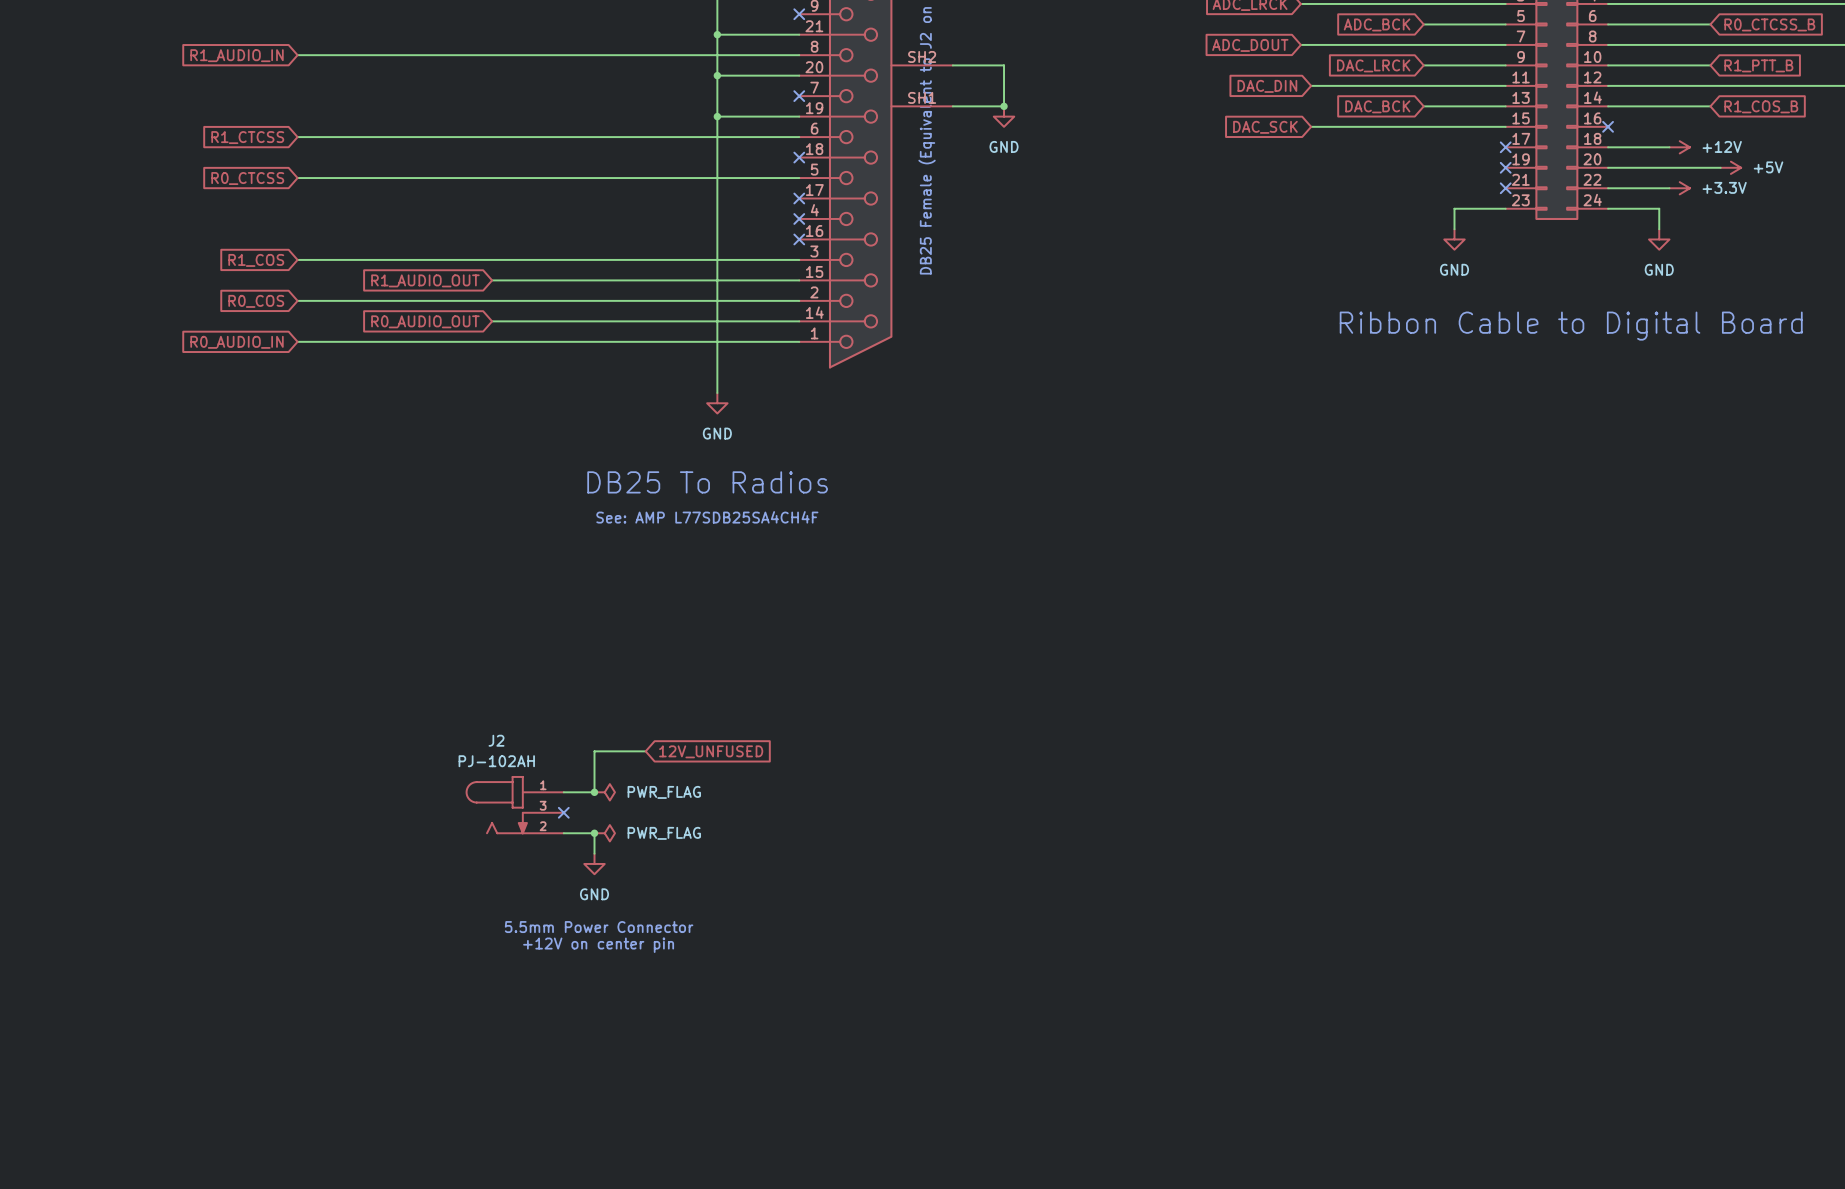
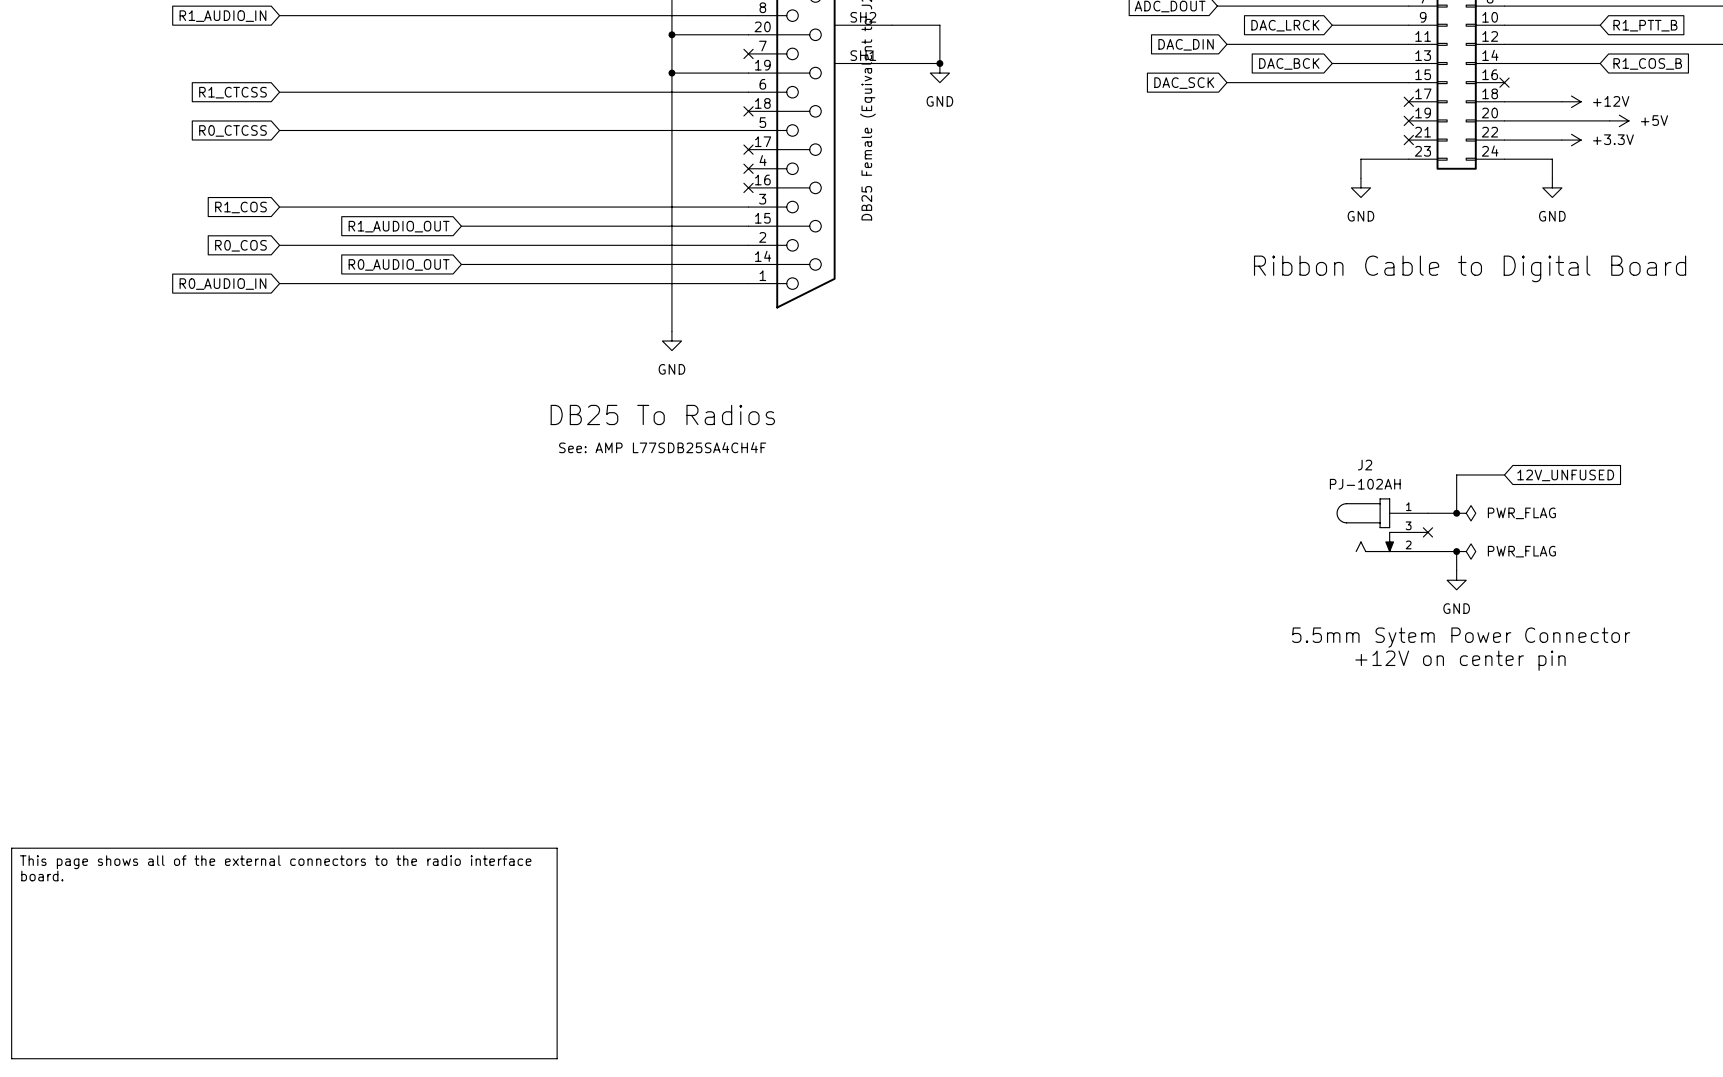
wire: none -> (1504, 474) (1456, 474) (1456, 513) (1427, 513)
global label: none -> 12V_UNFUSED (1565, 475)
junction: none -> (1456, 513)
power symbol: none -> PWR_FLAG (1466, 513)
no-connect mark: none -> (1427, 532)
wire: none -> (1427, 551) (1456, 551) (1456, 570)
junction: none -> (1456, 551)
power symbol: none -> PWR_FLAG (1466, 551)
power symbol: none -> GND (1456, 580)
text: none -> 5.5mm Sytem Power Connector (1461, 637)
text: none -> +12V on center pin (1460, 660)
wire: (645, 751) (594, 751) (594, 792) (563, 792) -> none
global label: 12V_UNFUSED (711, 751) -> none
junction: (594, 792) -> none
power symbol: PWR_FLAG (604, 792) -> none
J2 position: (514, 805) -> (1382, 525)
no-connect mark: (563, 812) -> none
wire: (563, 833) (594, 833) (594, 853) -> none
junction: (594, 833) -> none
power symbol: PWR_FLAG (604, 833) -> none
power symbol: GND (594, 863) -> none
text: 5.5mm Power Connector (599, 927) -> none
line: none -> (11, 848) (557, 848) (557, 1058) (11, 1058) (11, 848)
text: +12V on center pin (598, 945) -> none
text: none -> This page shows all of the external connectors to the radio interface (275, 862)
text: none -> board. (42, 876)

